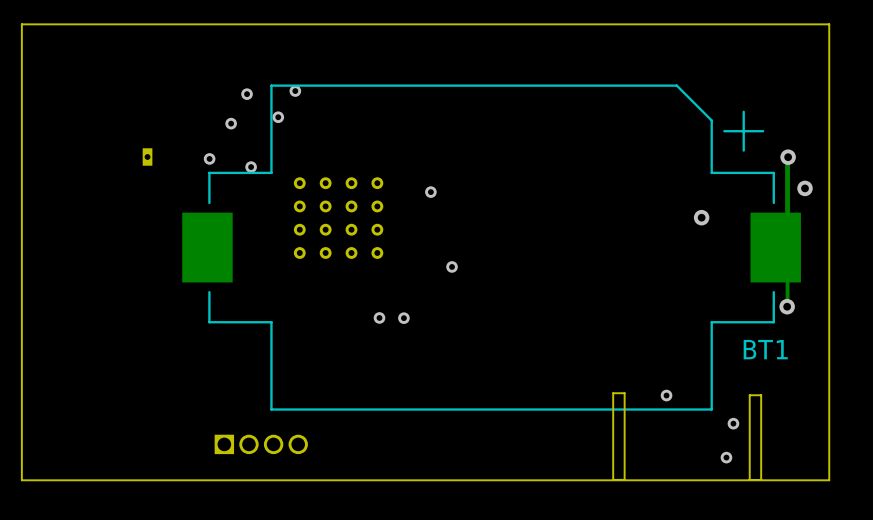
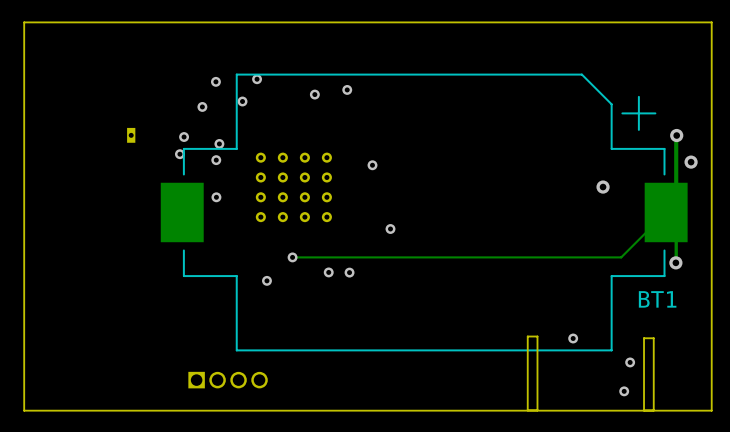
via: none -> (347, 89)
via: none -> (314, 94)
via: none -> (179, 154)
via: none -> (216, 160)
via: none -> (216, 197)
track: none -> (666, 212) (621, 257) (292, 257)
via: none -> (292, 257)
via: none -> (266, 280)

